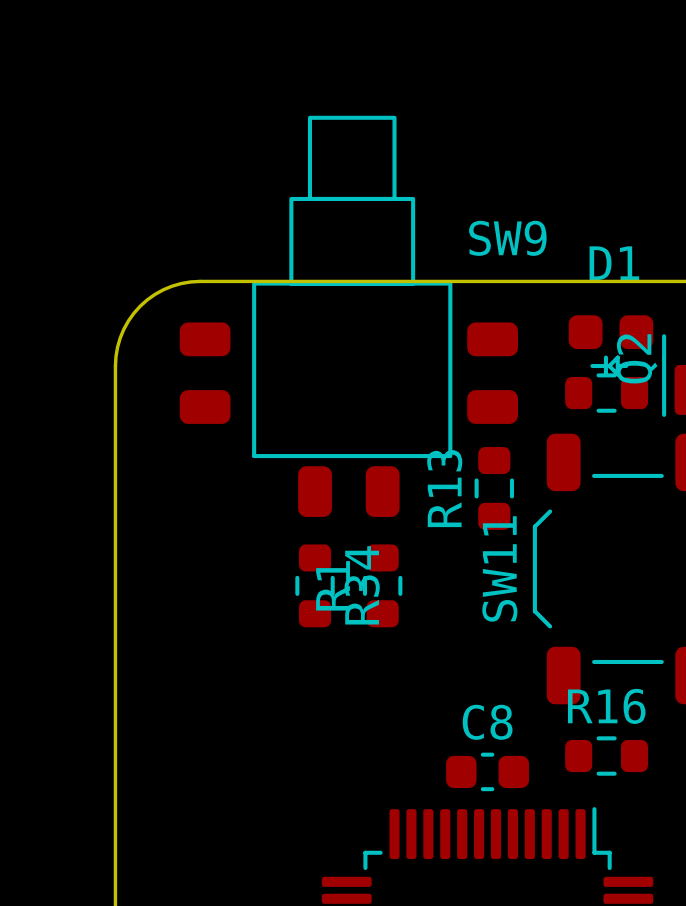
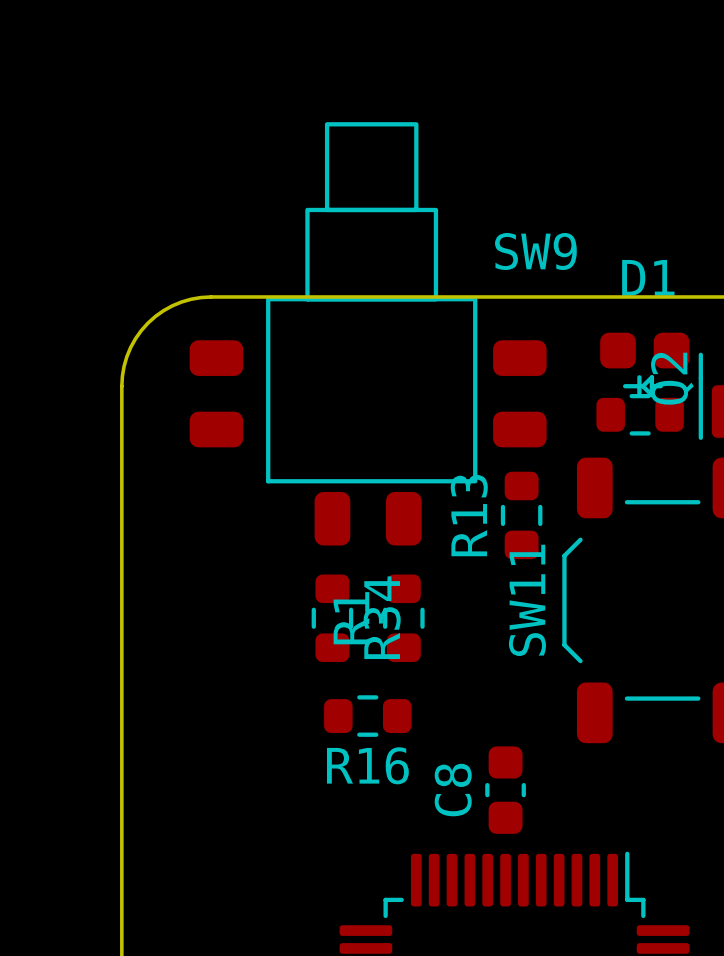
R16 name position: R16 (606, 706) -> R16 (367, 765)
C8 name position: C8 (487, 722) -> C8 (453, 790)
R16 position: (606, 756) -> (367, 716)
C8 rotation: 0° (487, 771) -> 90° clockwise (505, 790)

